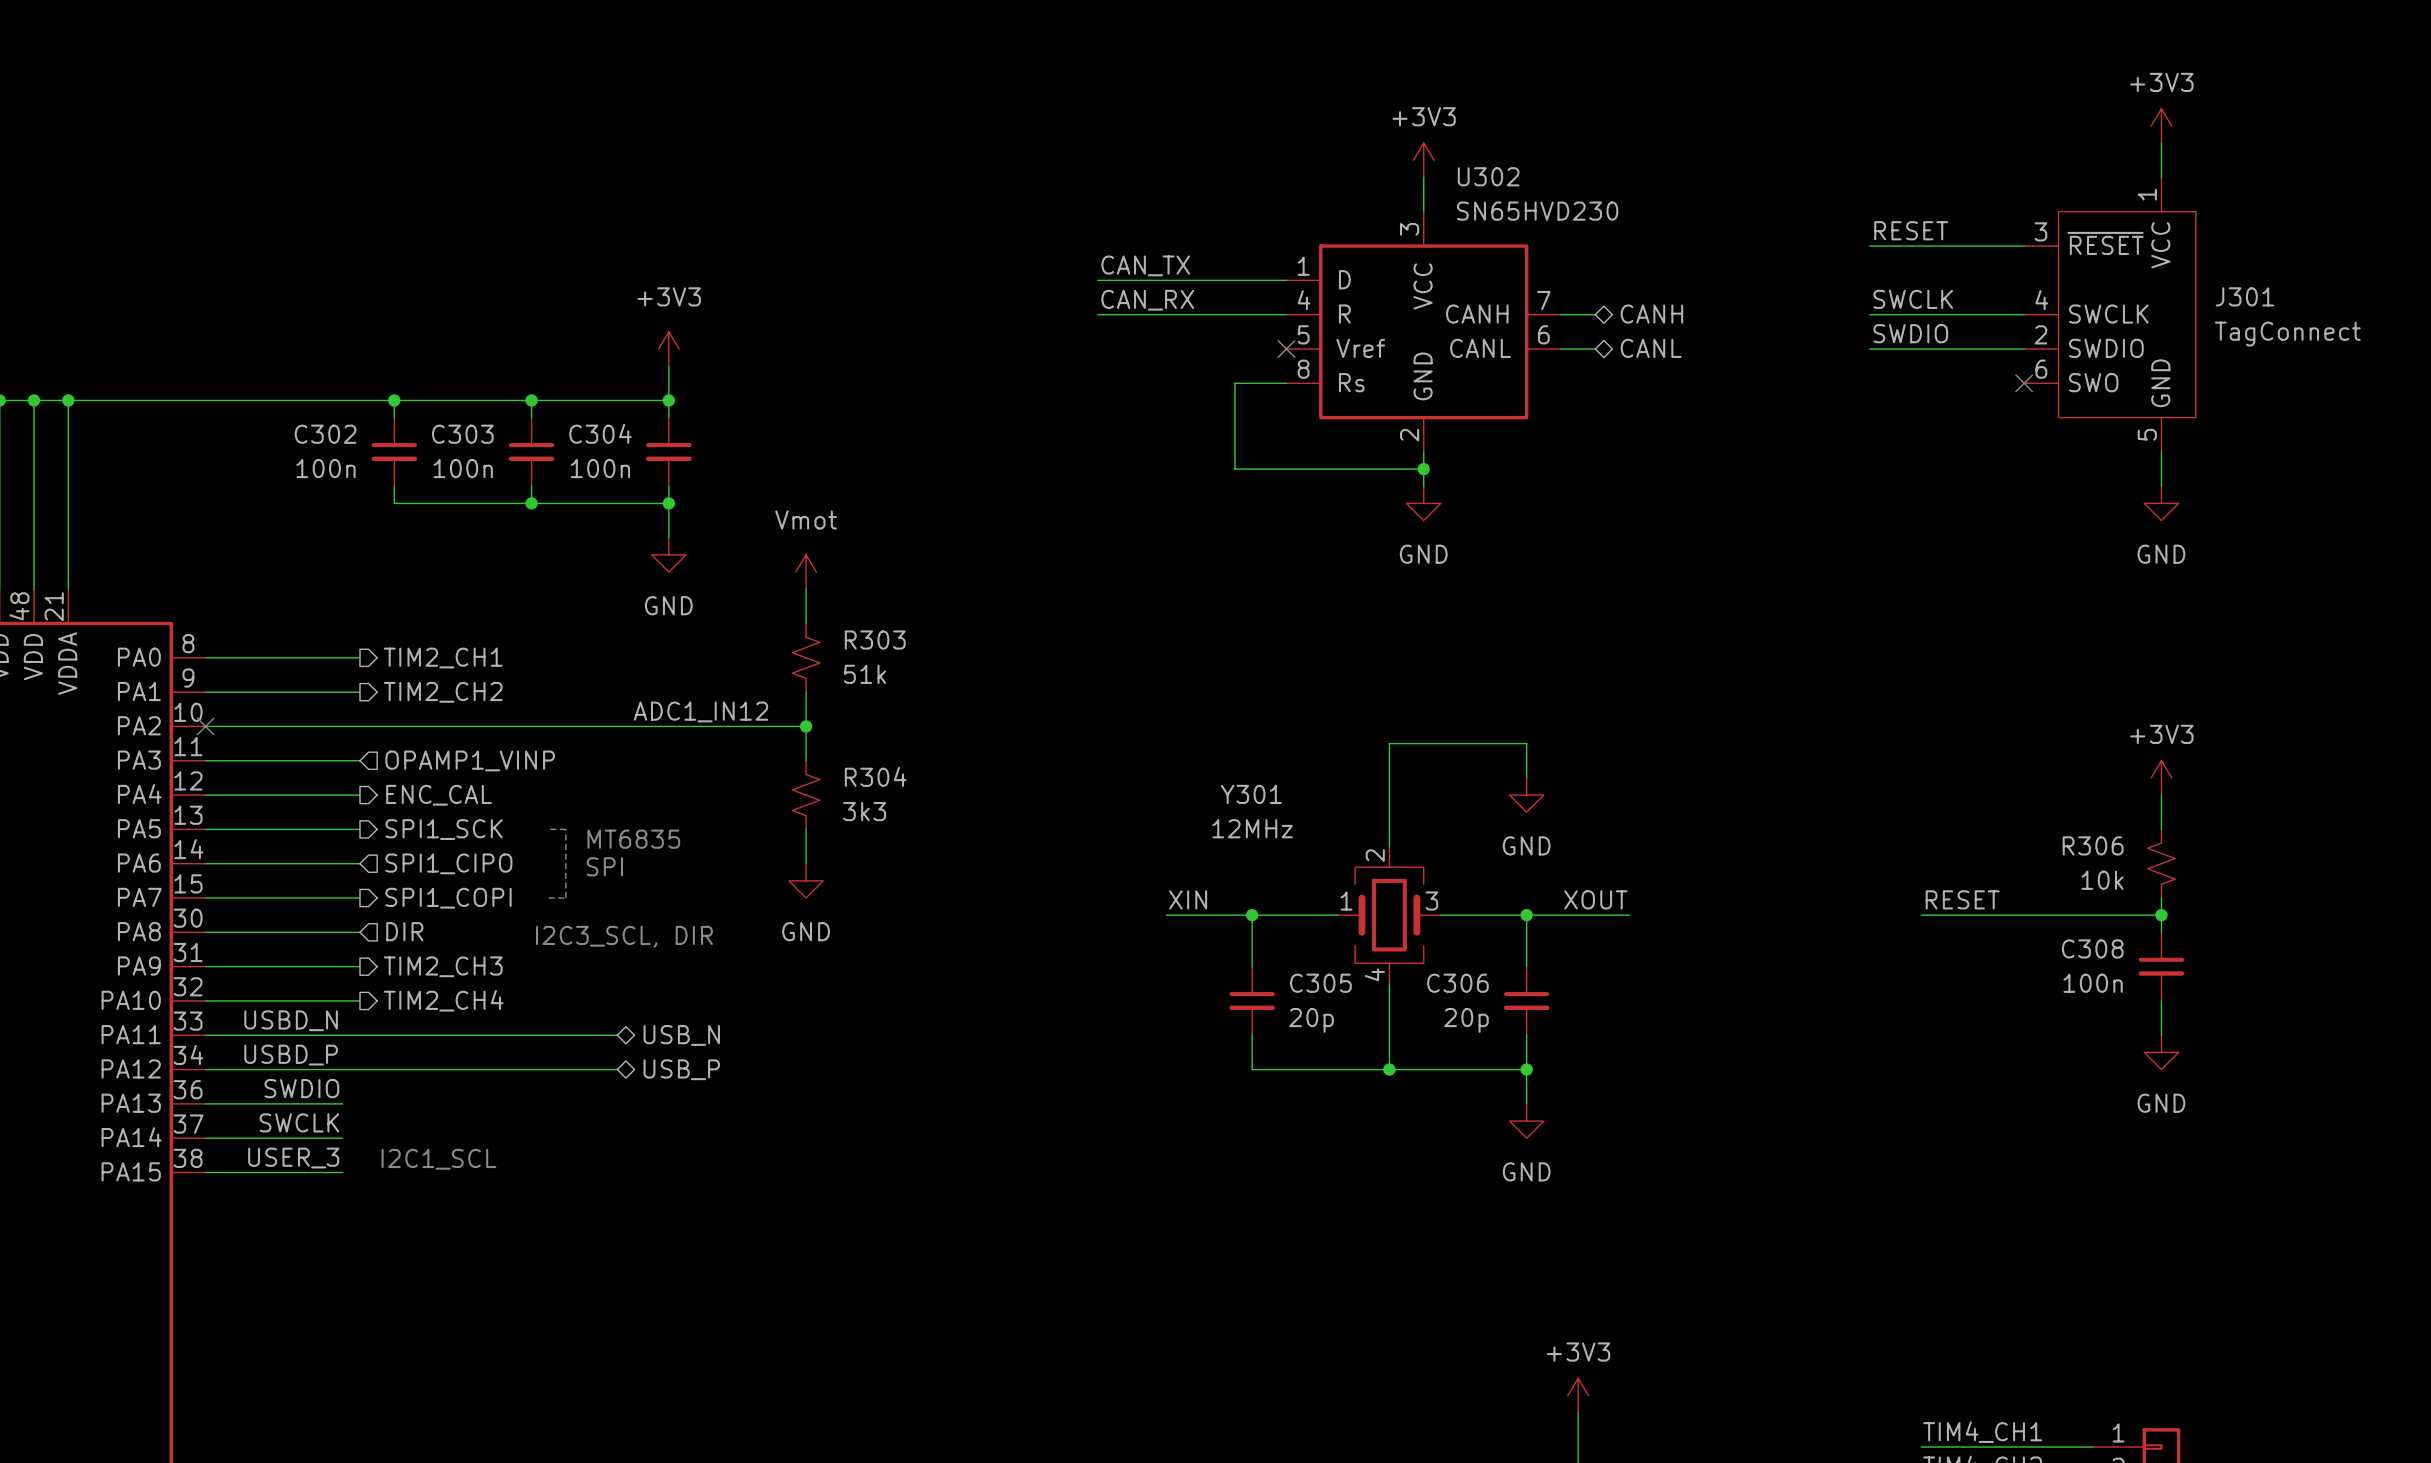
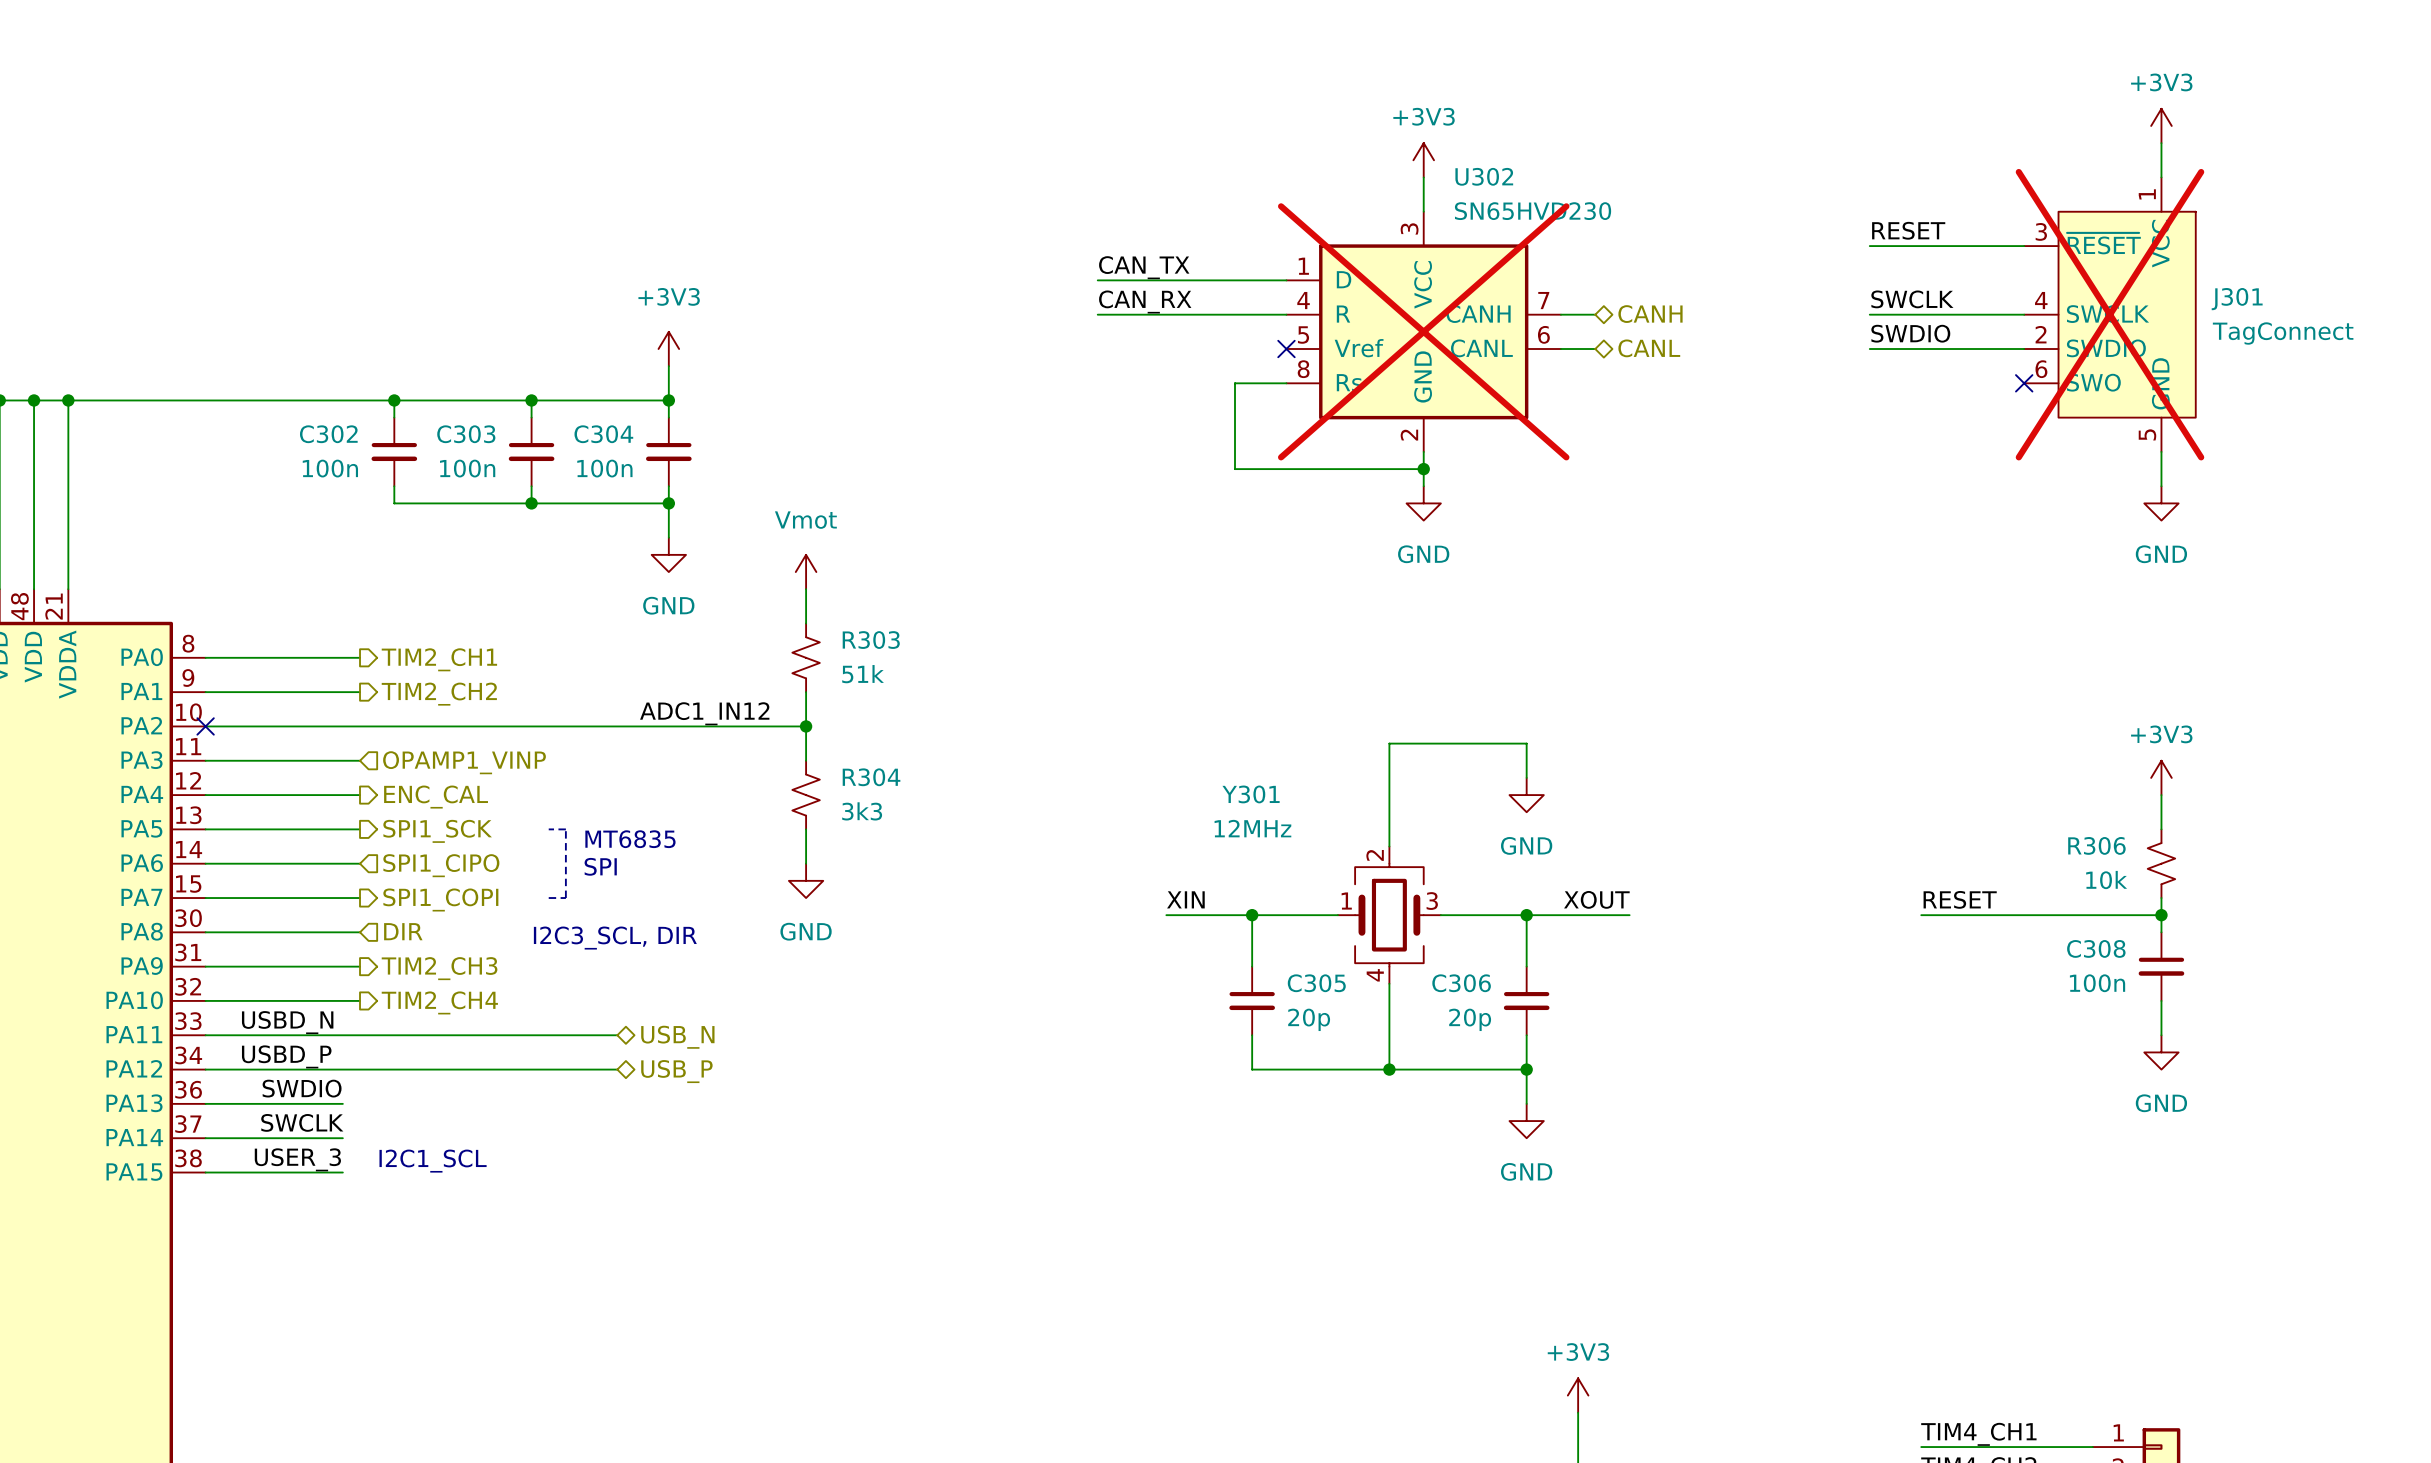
J301 do-not-place cross: none -> (2109, 314)
U302 do-not-place cross: none -> (1423, 331)

